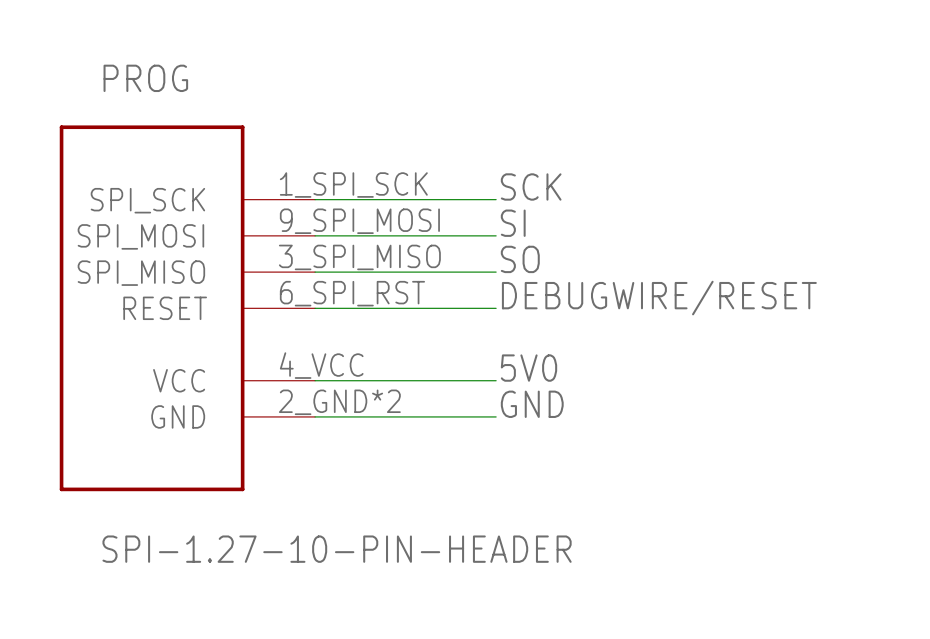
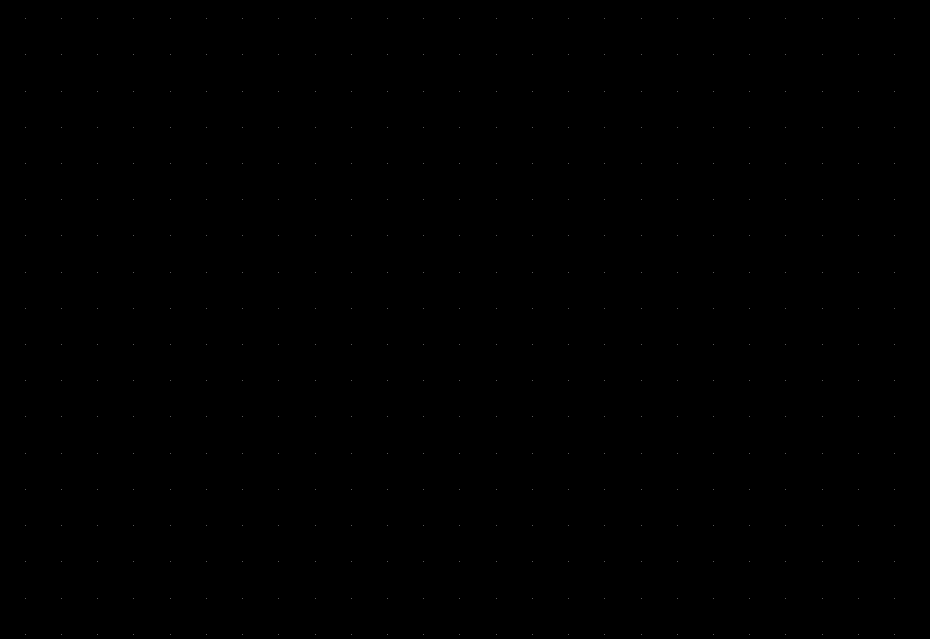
label: SCK (531, 186) -> none
wire: (315, 199) (496, 199) -> none
label: SI (513, 223) -> none
wire: (315, 235) (496, 235) -> none
label: SO (520, 259) -> none
wire: (315, 272) (496, 272) -> none
label: DEBUGWIRE/RESET (659, 298) -> none
PROG: SPI-1.27-10-PIN-HEADER (187, 308) -> none
wire: (315, 308) (496, 308) -> none
label: 5V0 (528, 368) -> none
wire: (315, 380) (496, 380) -> none
label: GND (532, 404) -> none
wire: (315, 416) (496, 416) -> none

